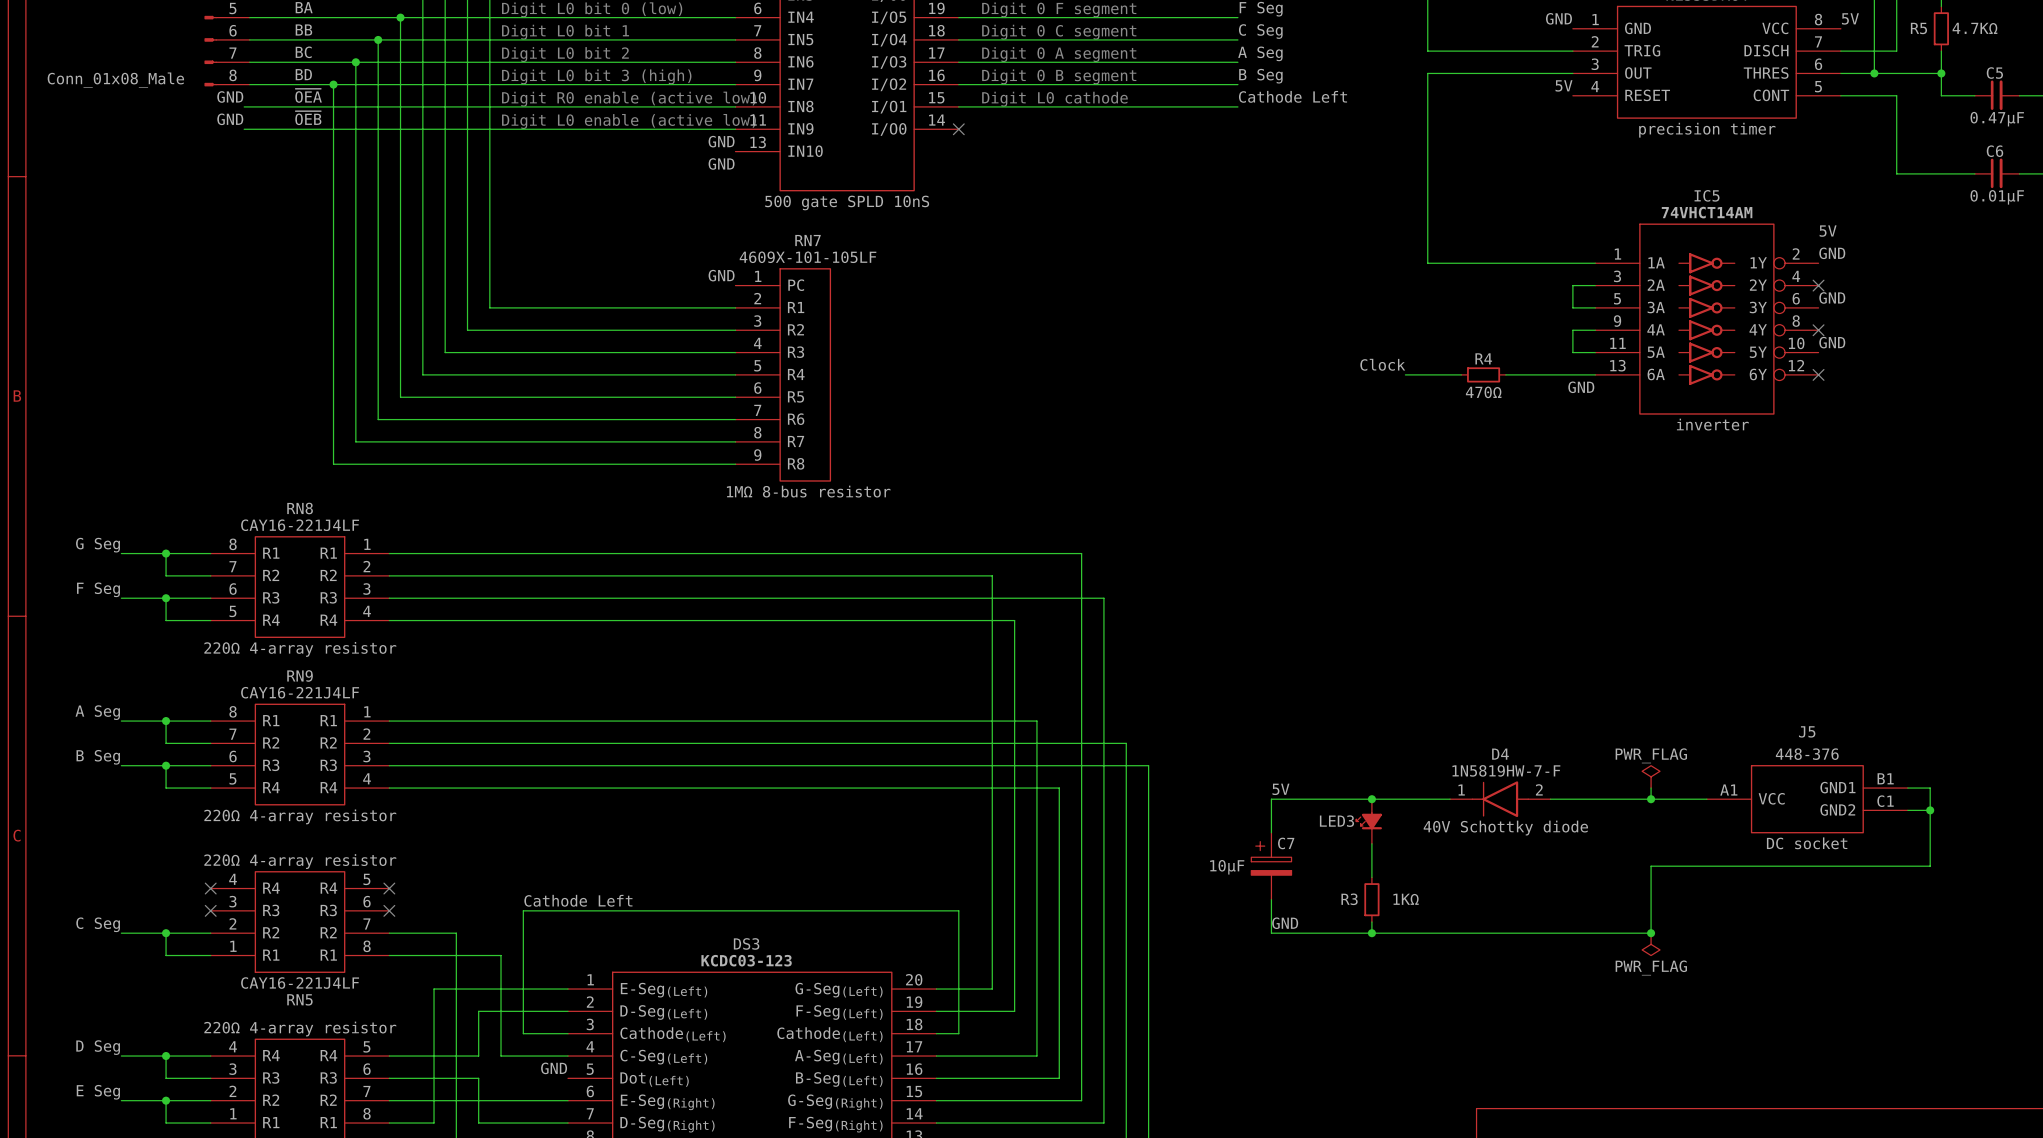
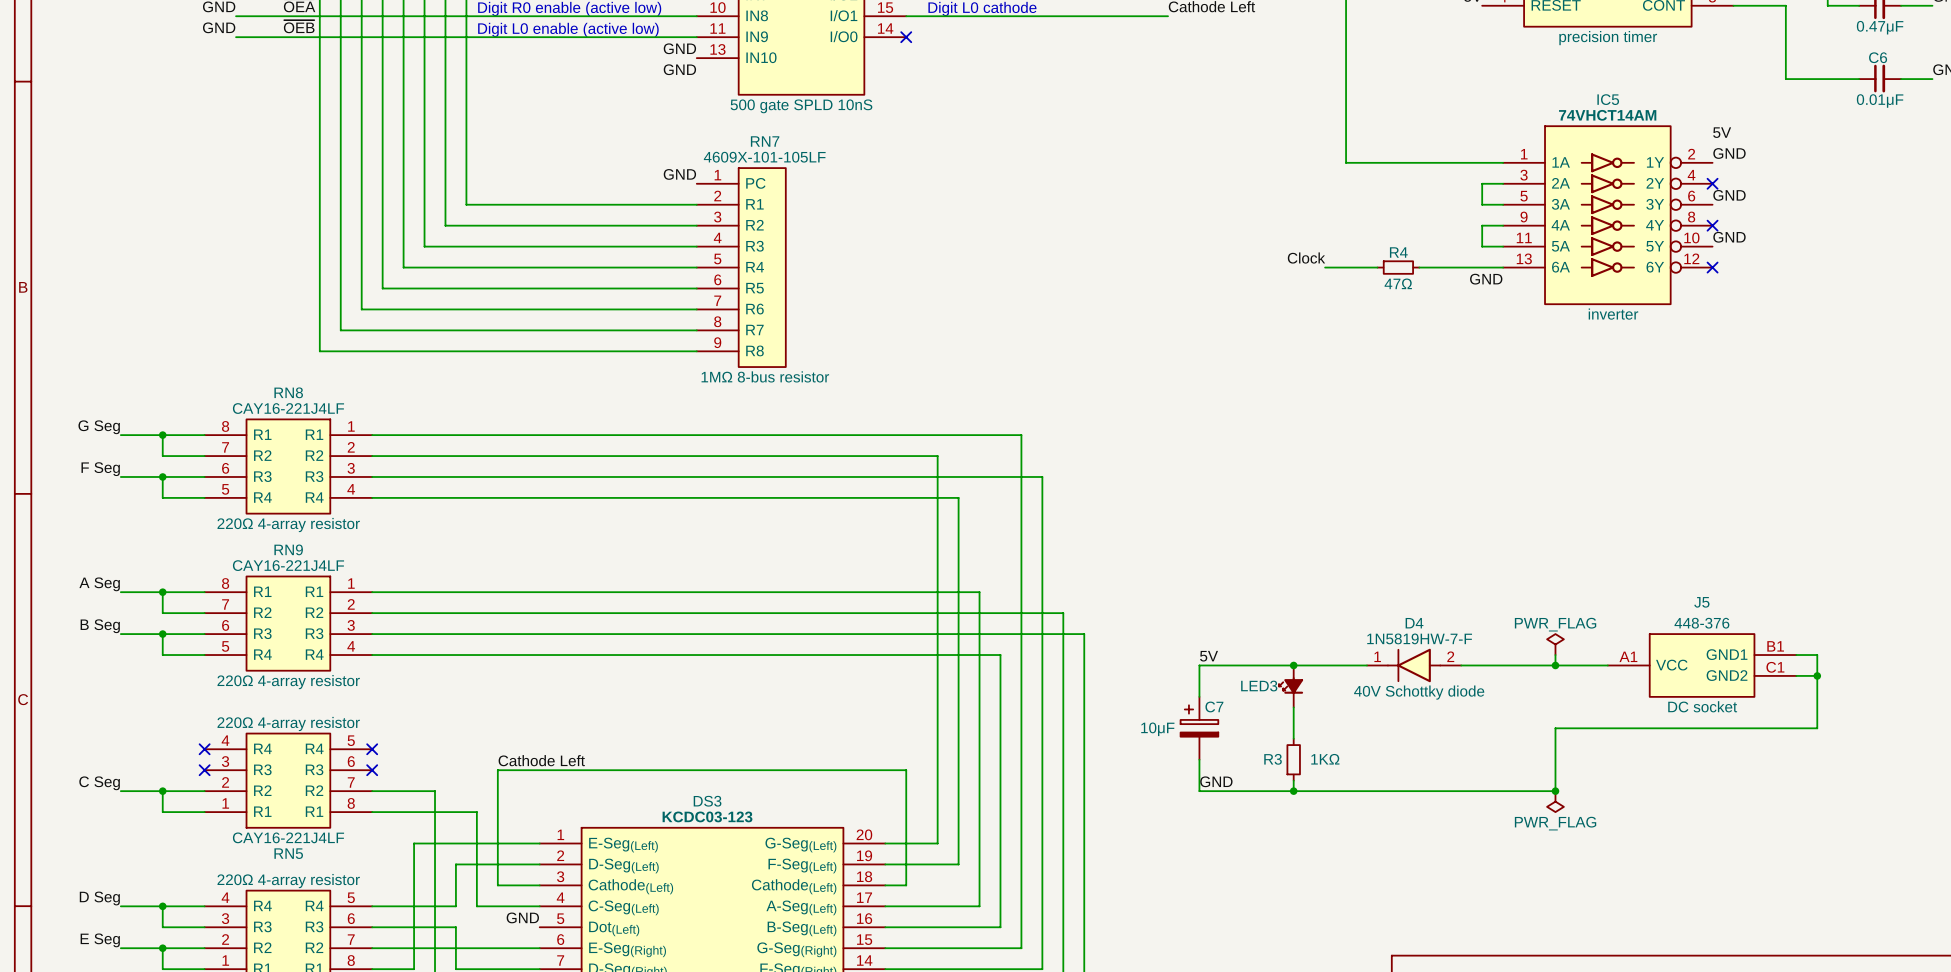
R4 text: 470Ω (1483, 392) -> 47Ω (1398, 283)

